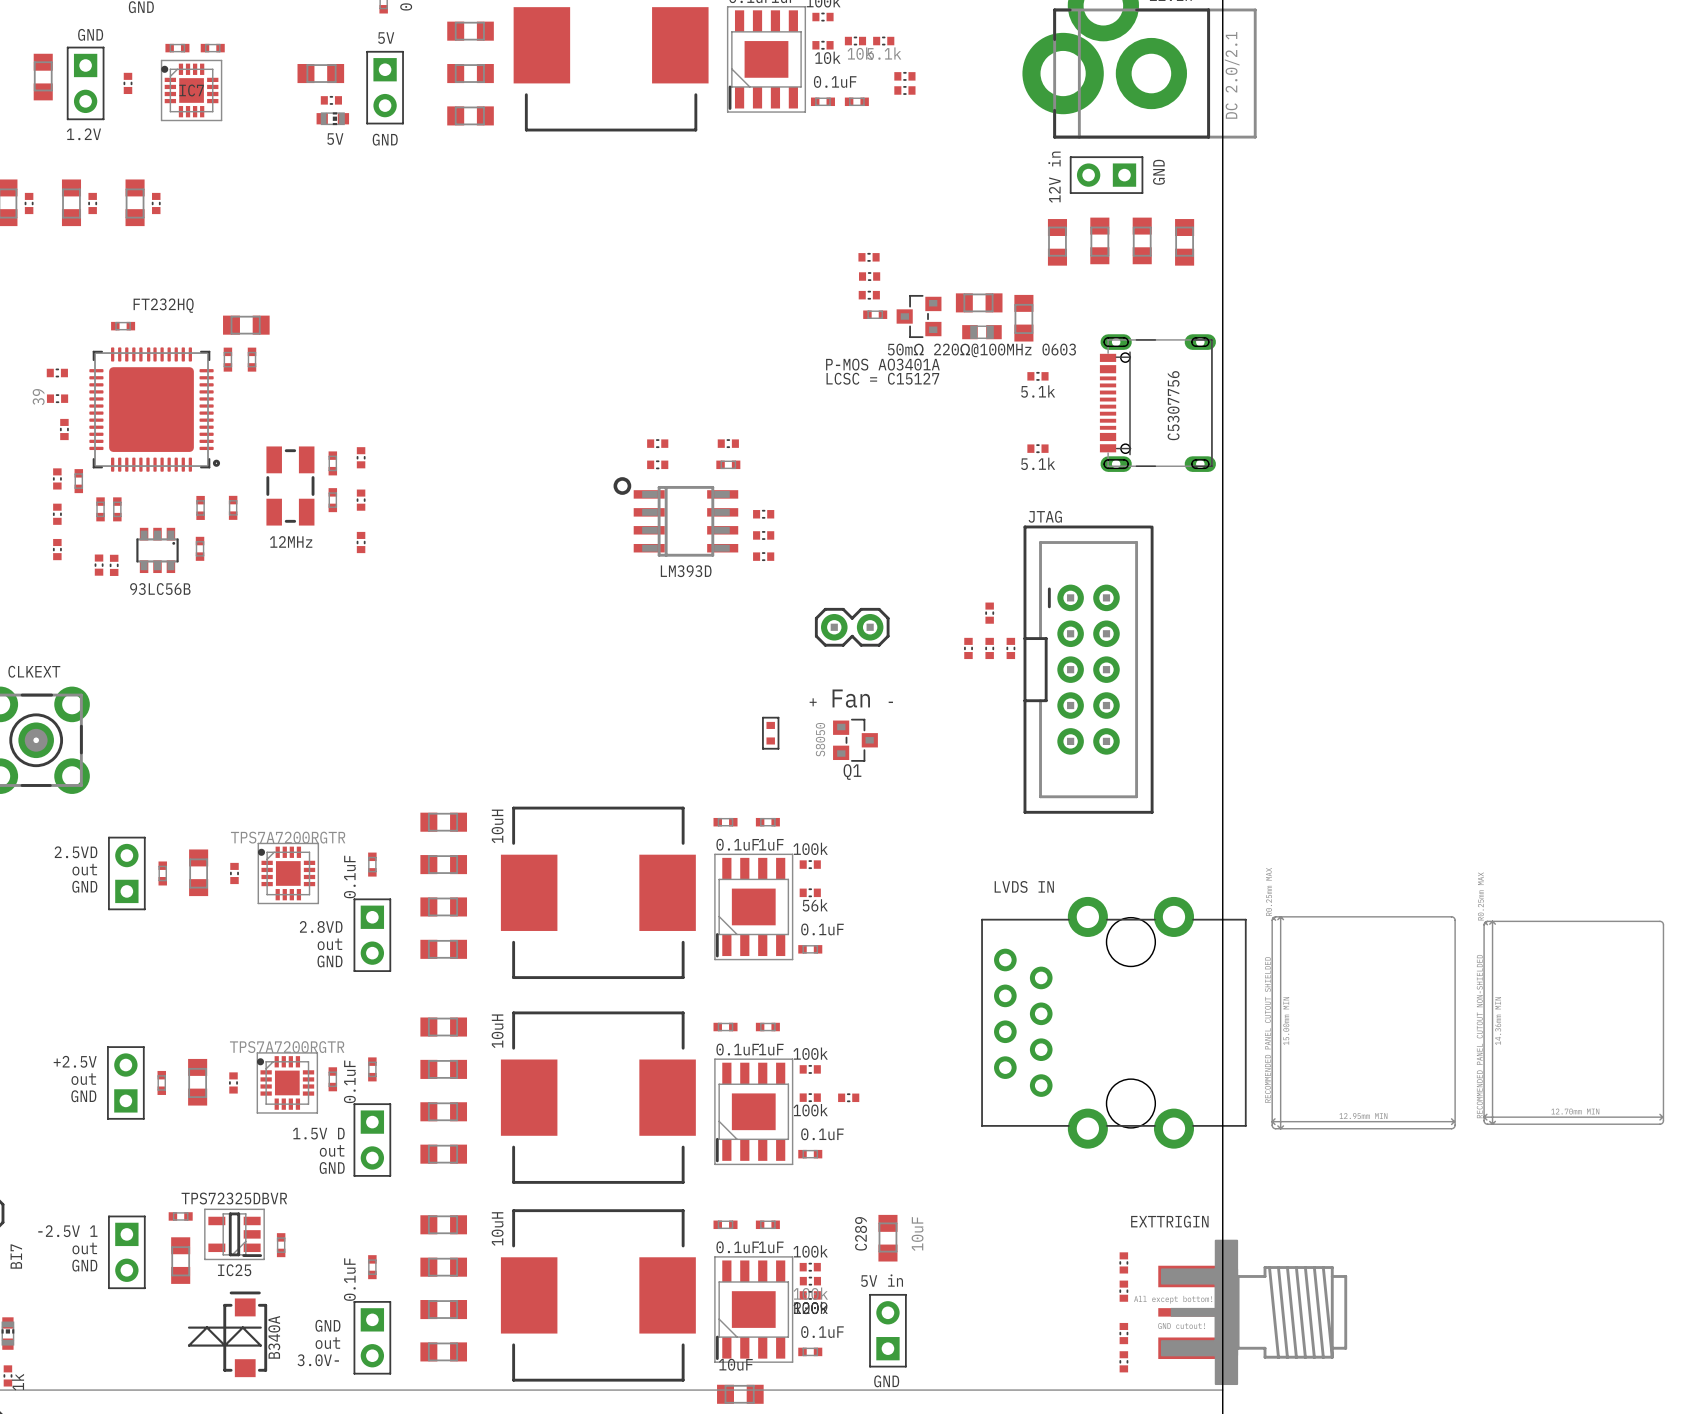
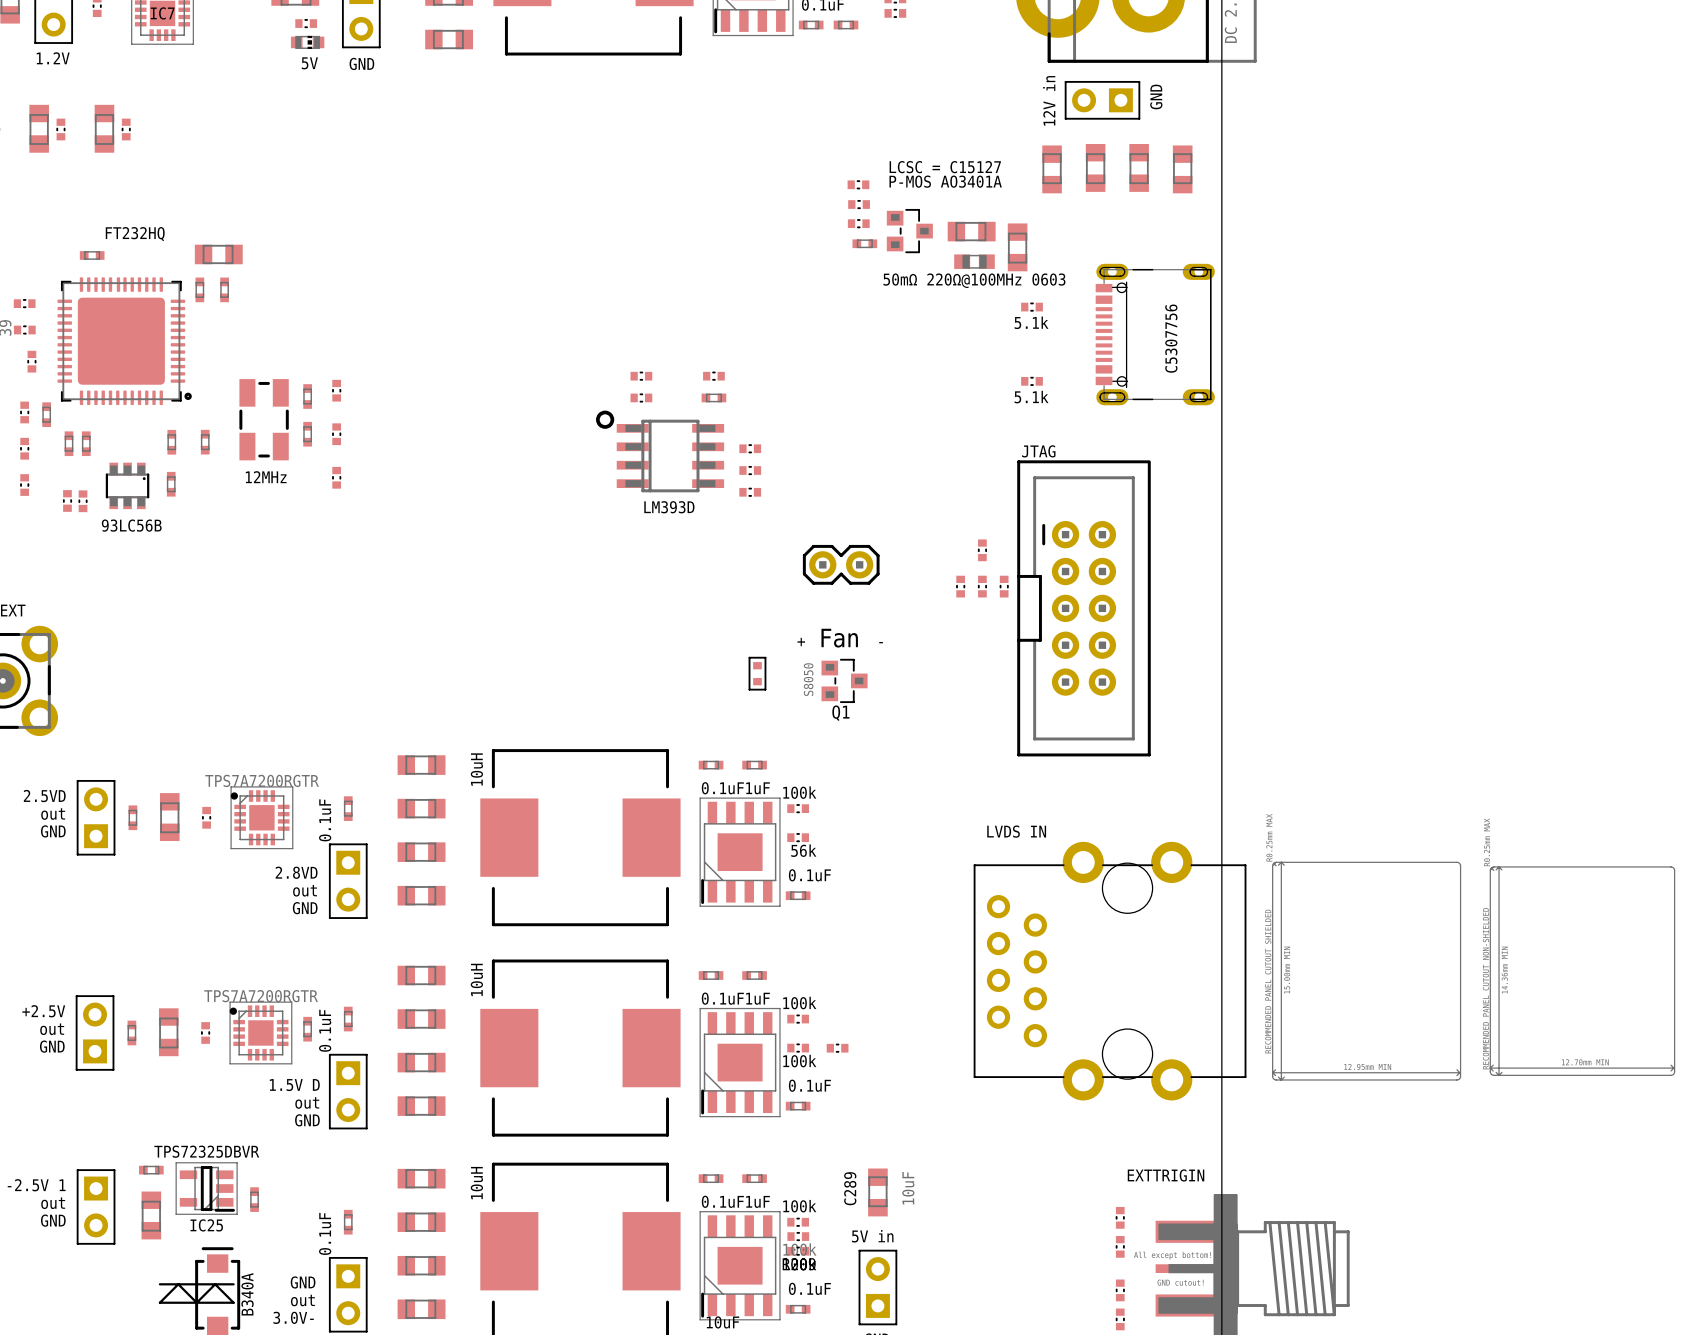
part rotation: 0° (919, 316) -> 180° (909, 231)

